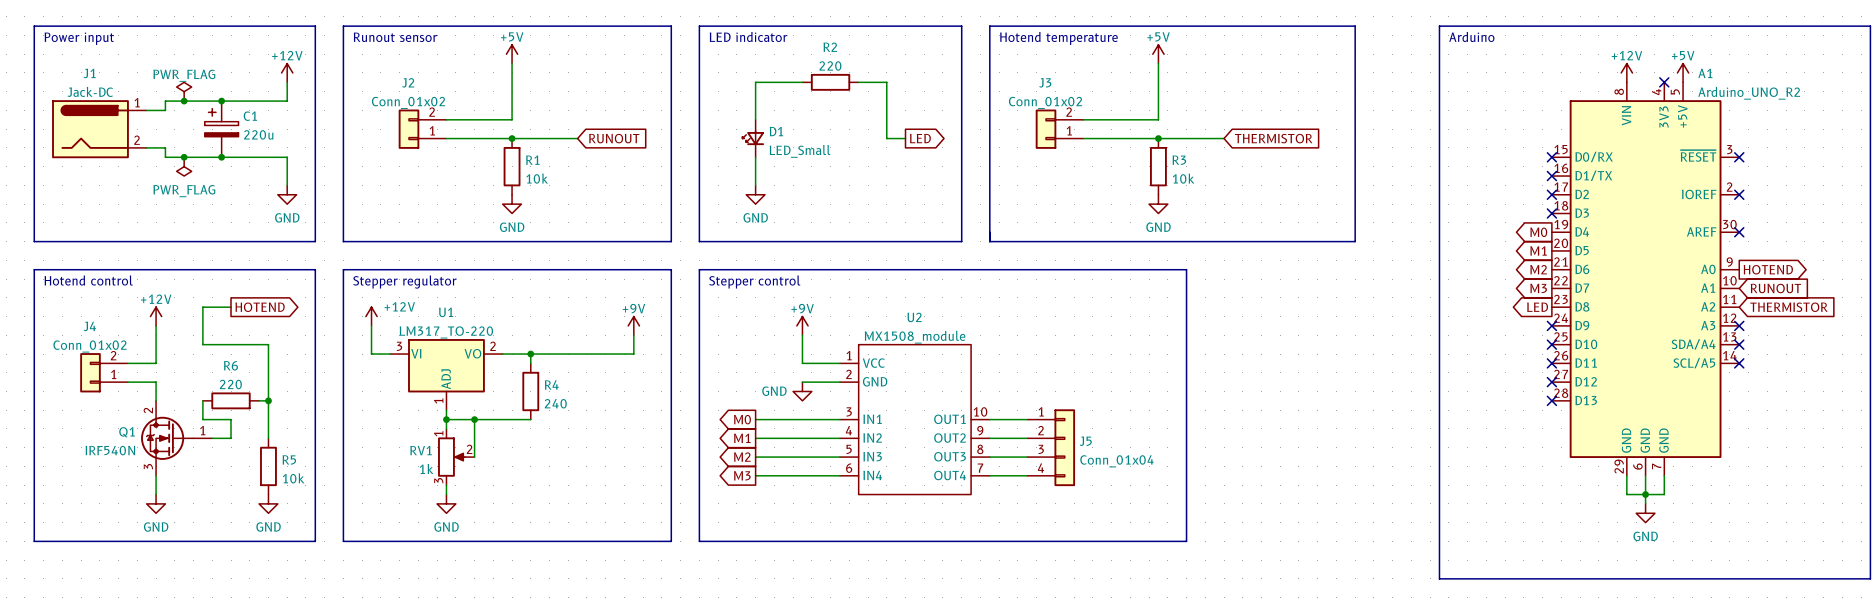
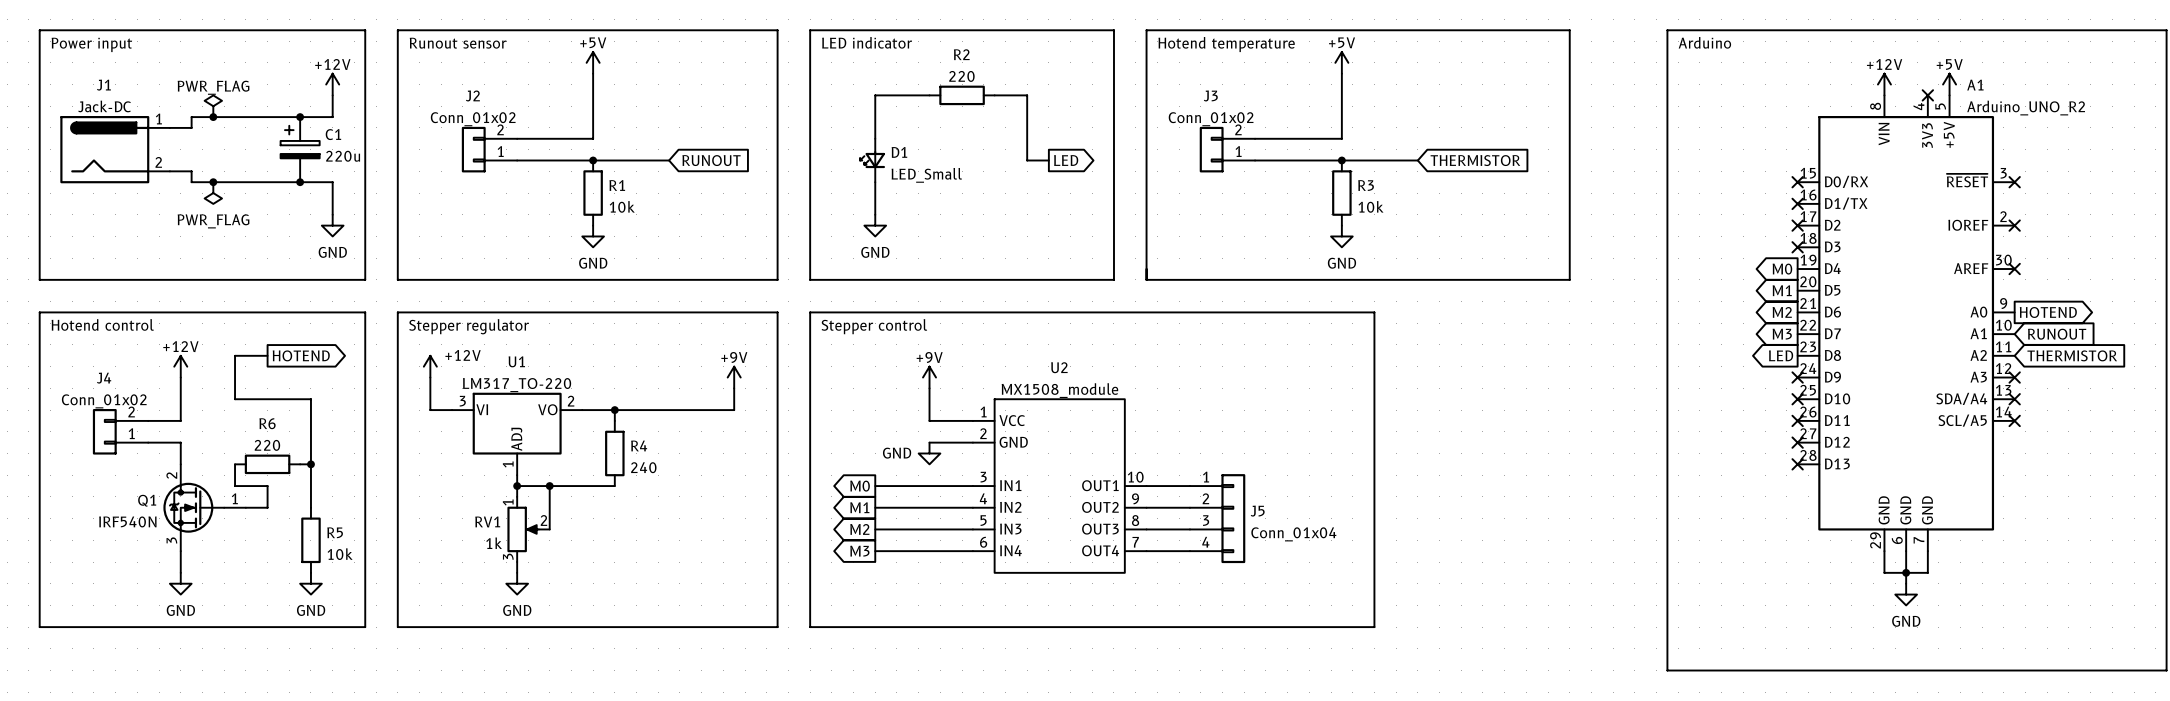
junction: (221, 101) -> none
junction: none -> (300, 117)
C1 position: (221, 129) -> (300, 149)
junction: (221, 157) -> none
junction: none -> (300, 182)

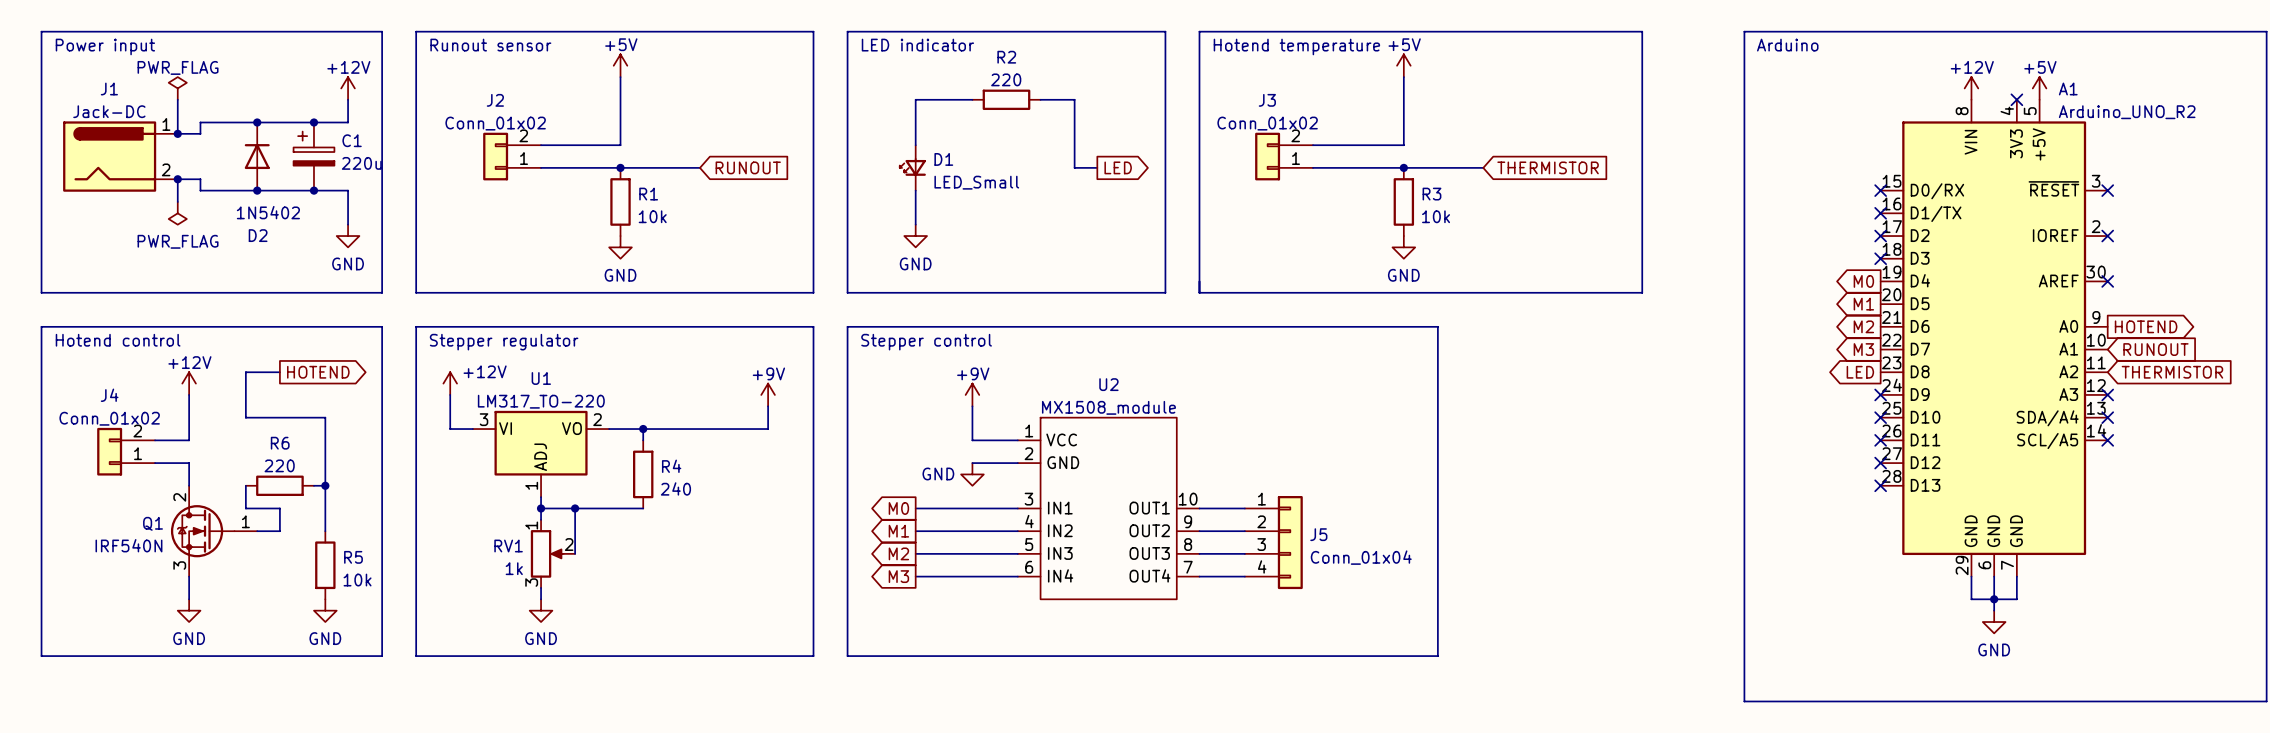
wire: none -> (177, 99) (177, 133)
power symbol position: PWR_FLAG (213, 106) -> PWR_FLAG (177, 88)
junction: (213, 117) -> none
junction: none -> (257, 122)
junction: none -> (177, 133)
D2: none -> 1N5402 (257, 156)
wire: none -> (177, 179) (177, 201)
junction: none -> (177, 179)
junction: (213, 182) -> none
junction: none -> (257, 190)
power symbol position: PWR_FLAG (213, 193) -> PWR_FLAG (177, 213)

